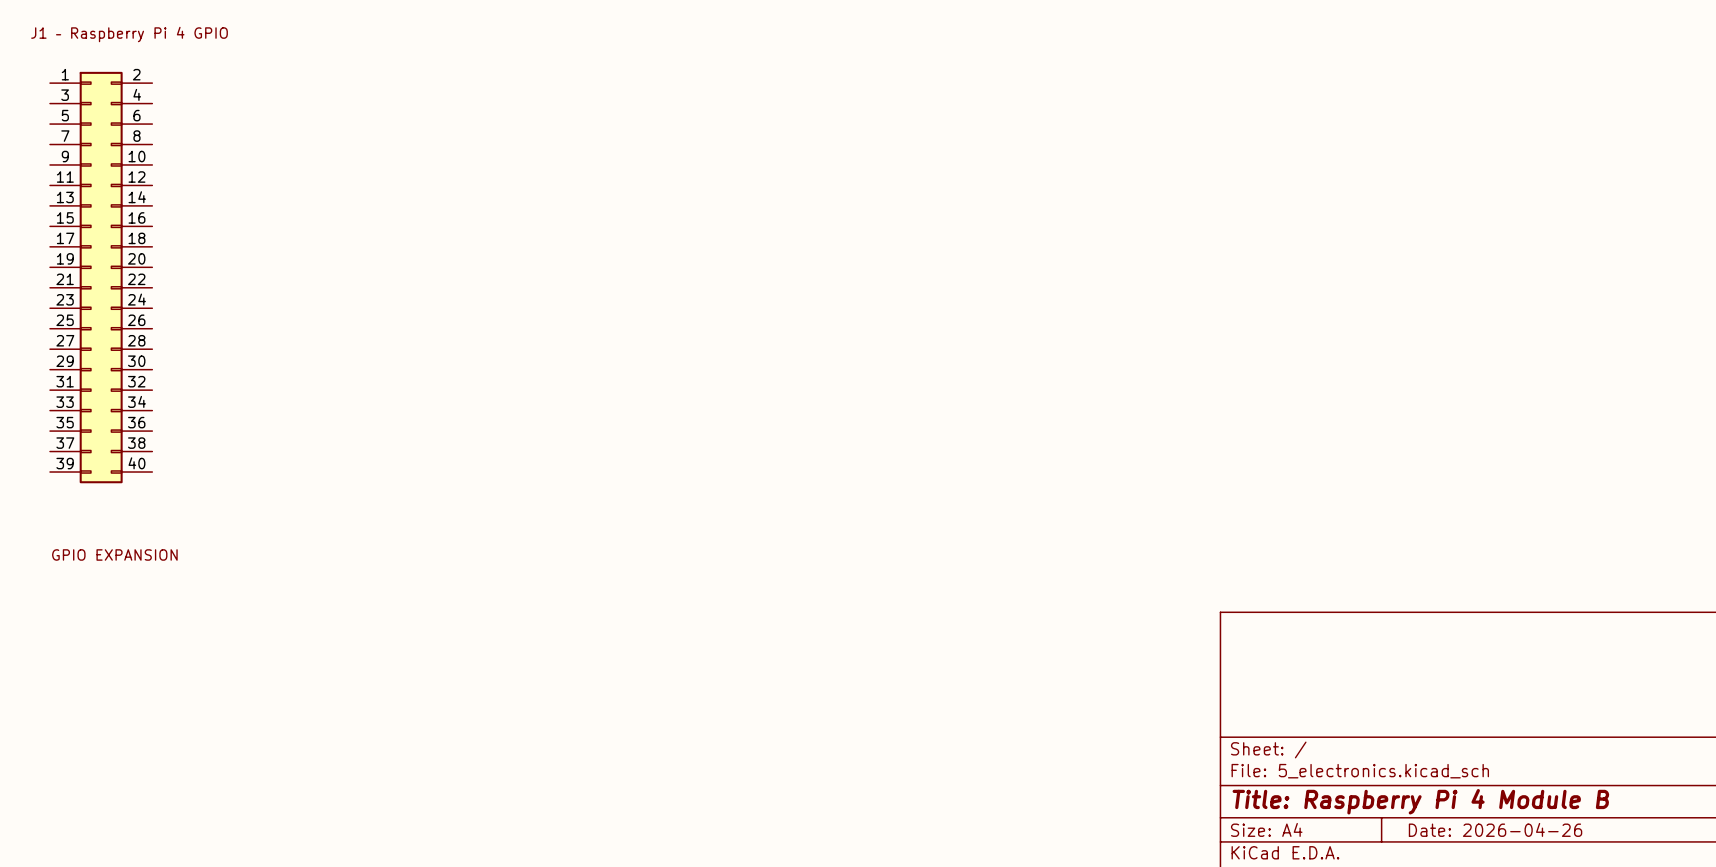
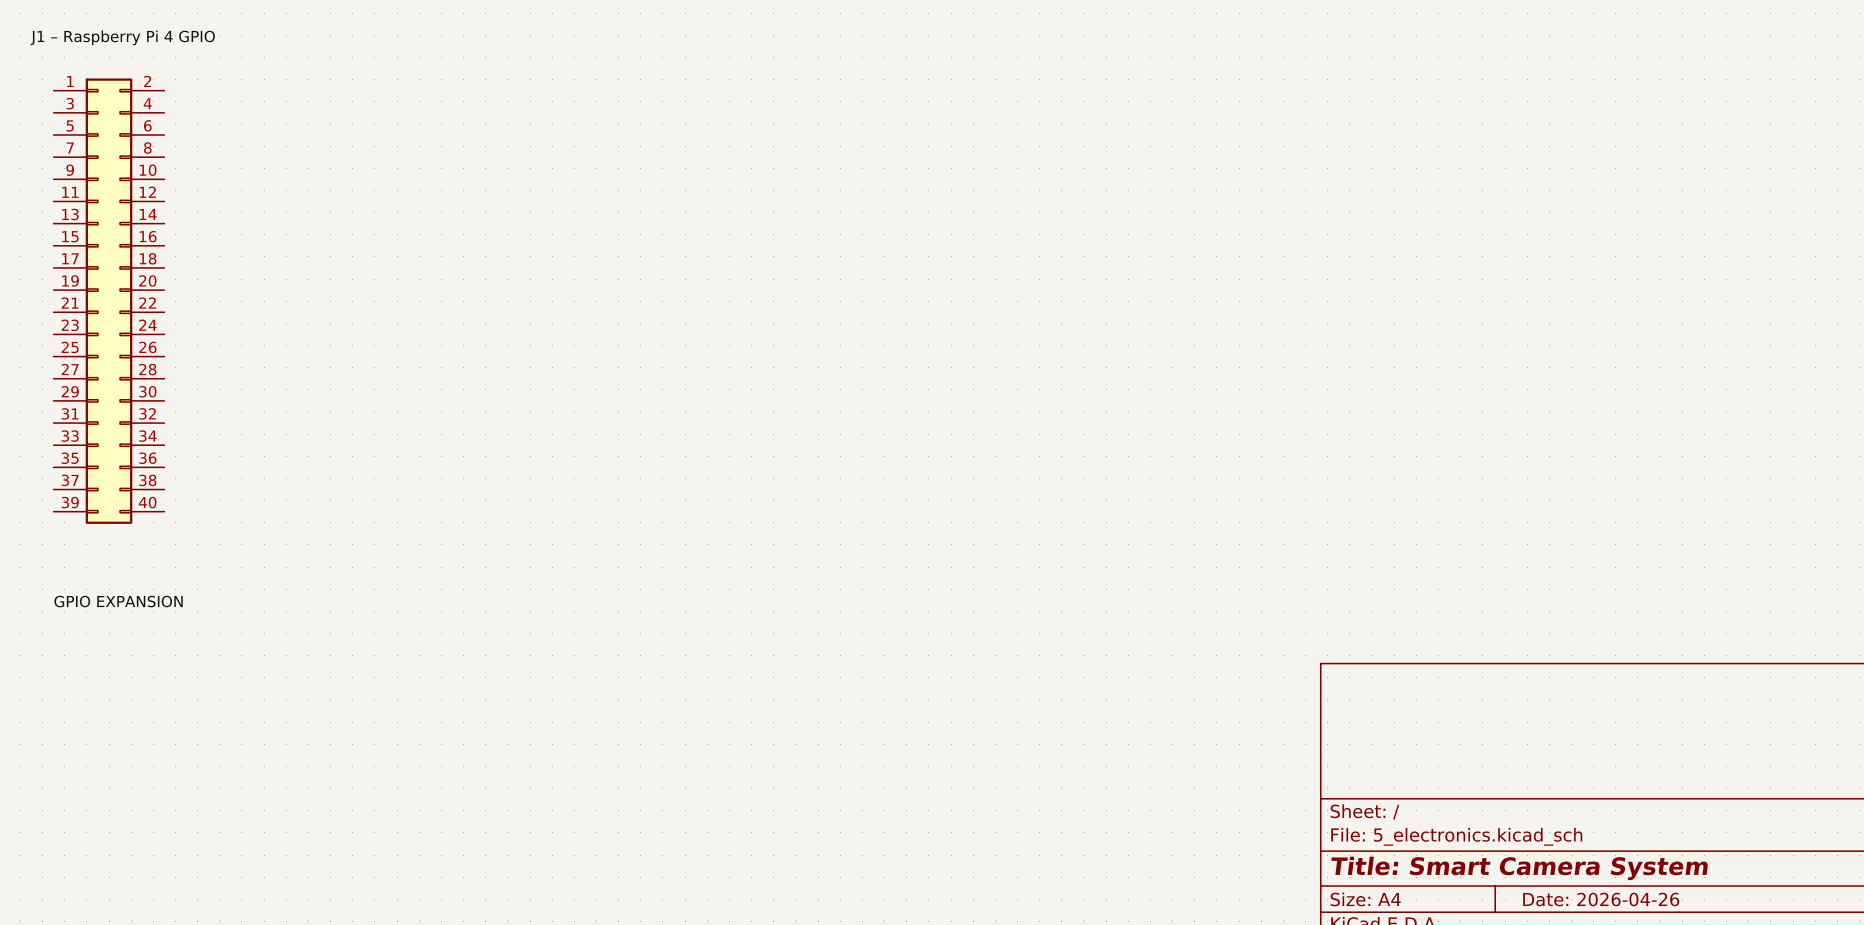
title block: Title: Raspberry Pi 4 Module B (1420, 801) -> Title: Smart Camera System (1519, 868)

